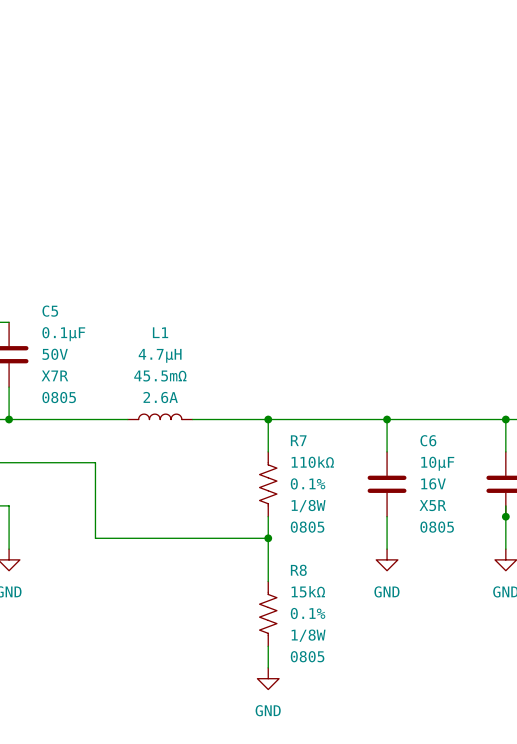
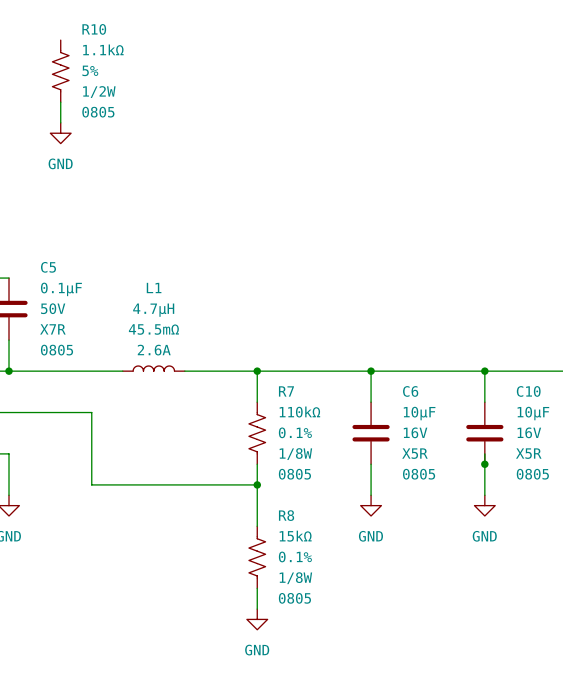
R10: none -> (60, 71)
wire: none -> (60, 102) (60, 122)
power symbol: none -> GND (60, 133)

